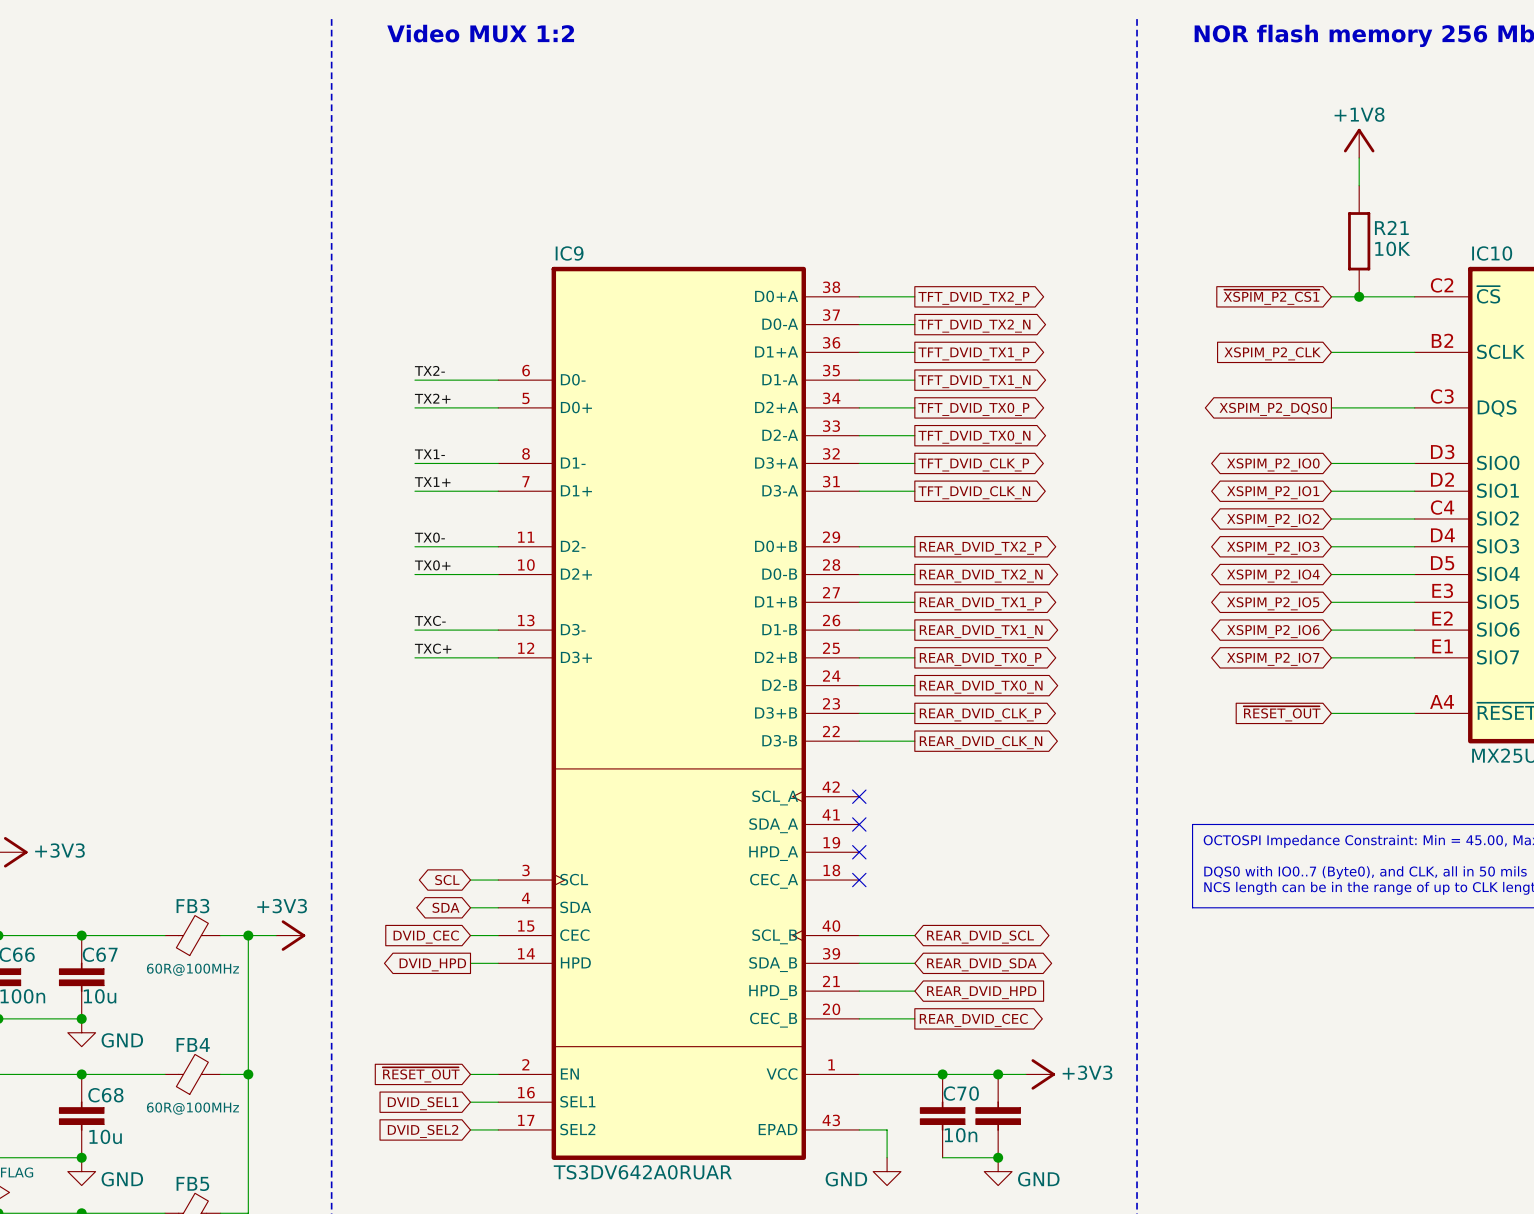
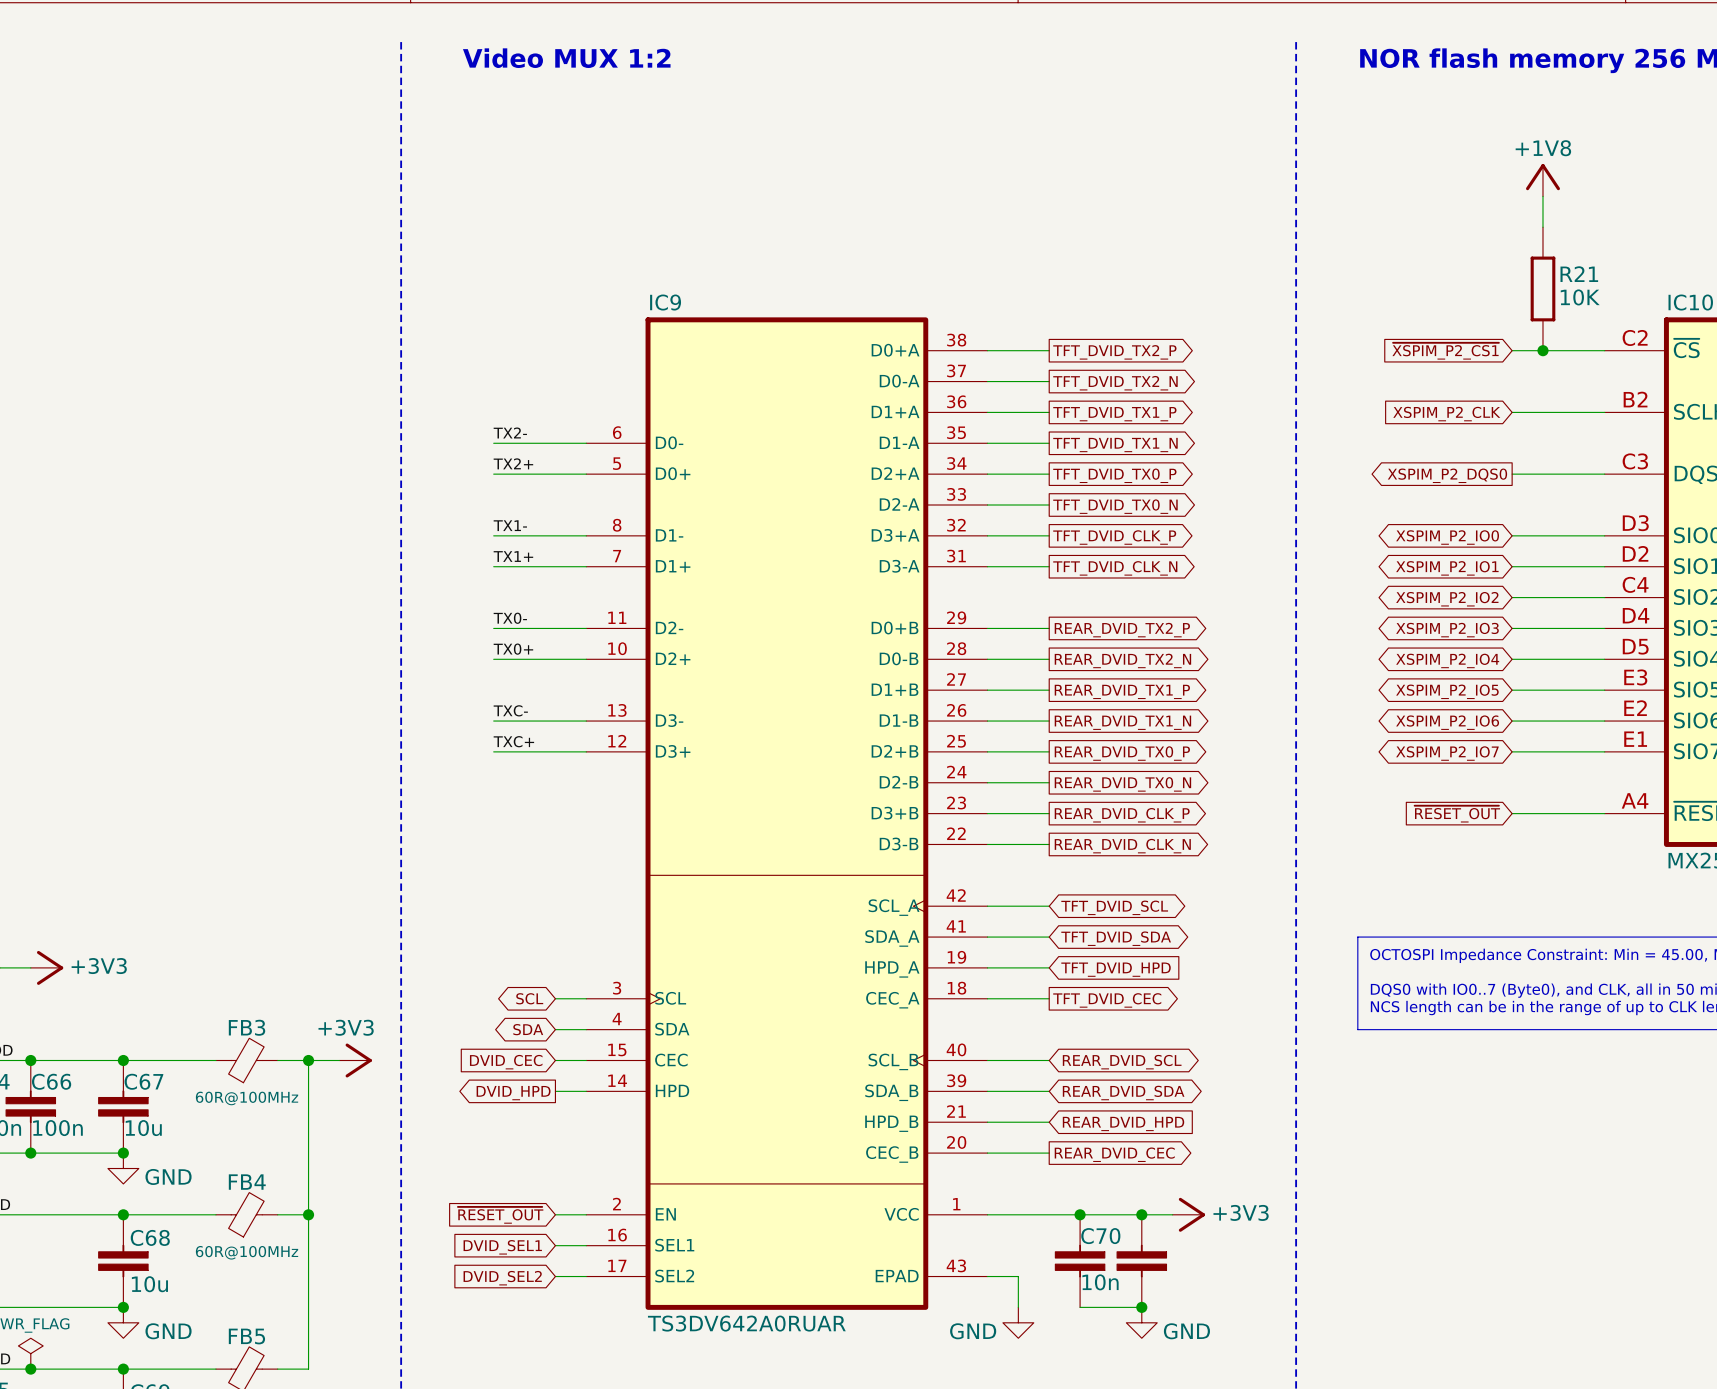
wire: none -> (987, 906) (1049, 906)
no-connect mark: (859, 796) -> none
global label: none -> TFT_DVID_SCL (1114, 907)
wire: none -> (987, 937) (1049, 937)
no-connect mark: (859, 824) -> none
global label: none -> TFT_DVID_SDA (1116, 938)
wire: none -> (987, 967) (1049, 967)
no-connect mark: (859, 852) -> none
global label: none -> TFT_DVID_HPD (1116, 969)
wire: none -> (987, 998) (1049, 998)
no-connect mark: (859, 880) -> none
global label: none -> TFT_DVID_CEC (1107, 1000)

